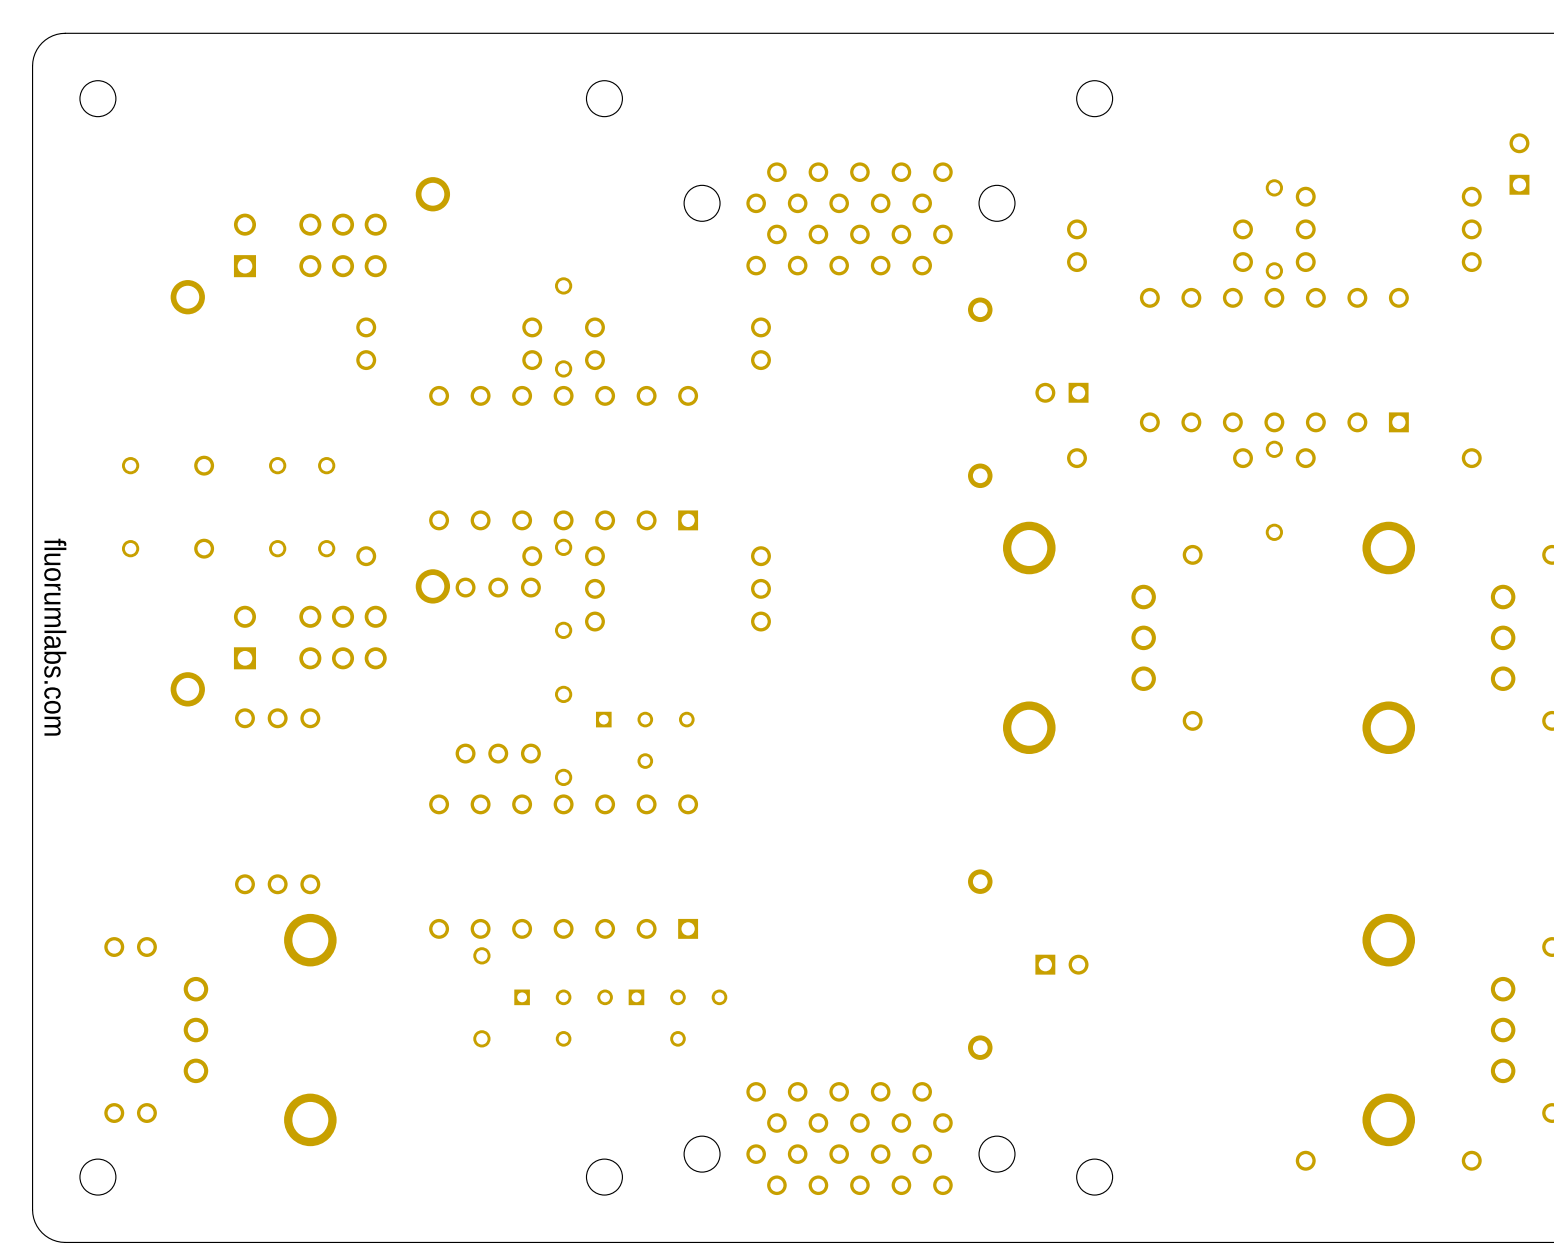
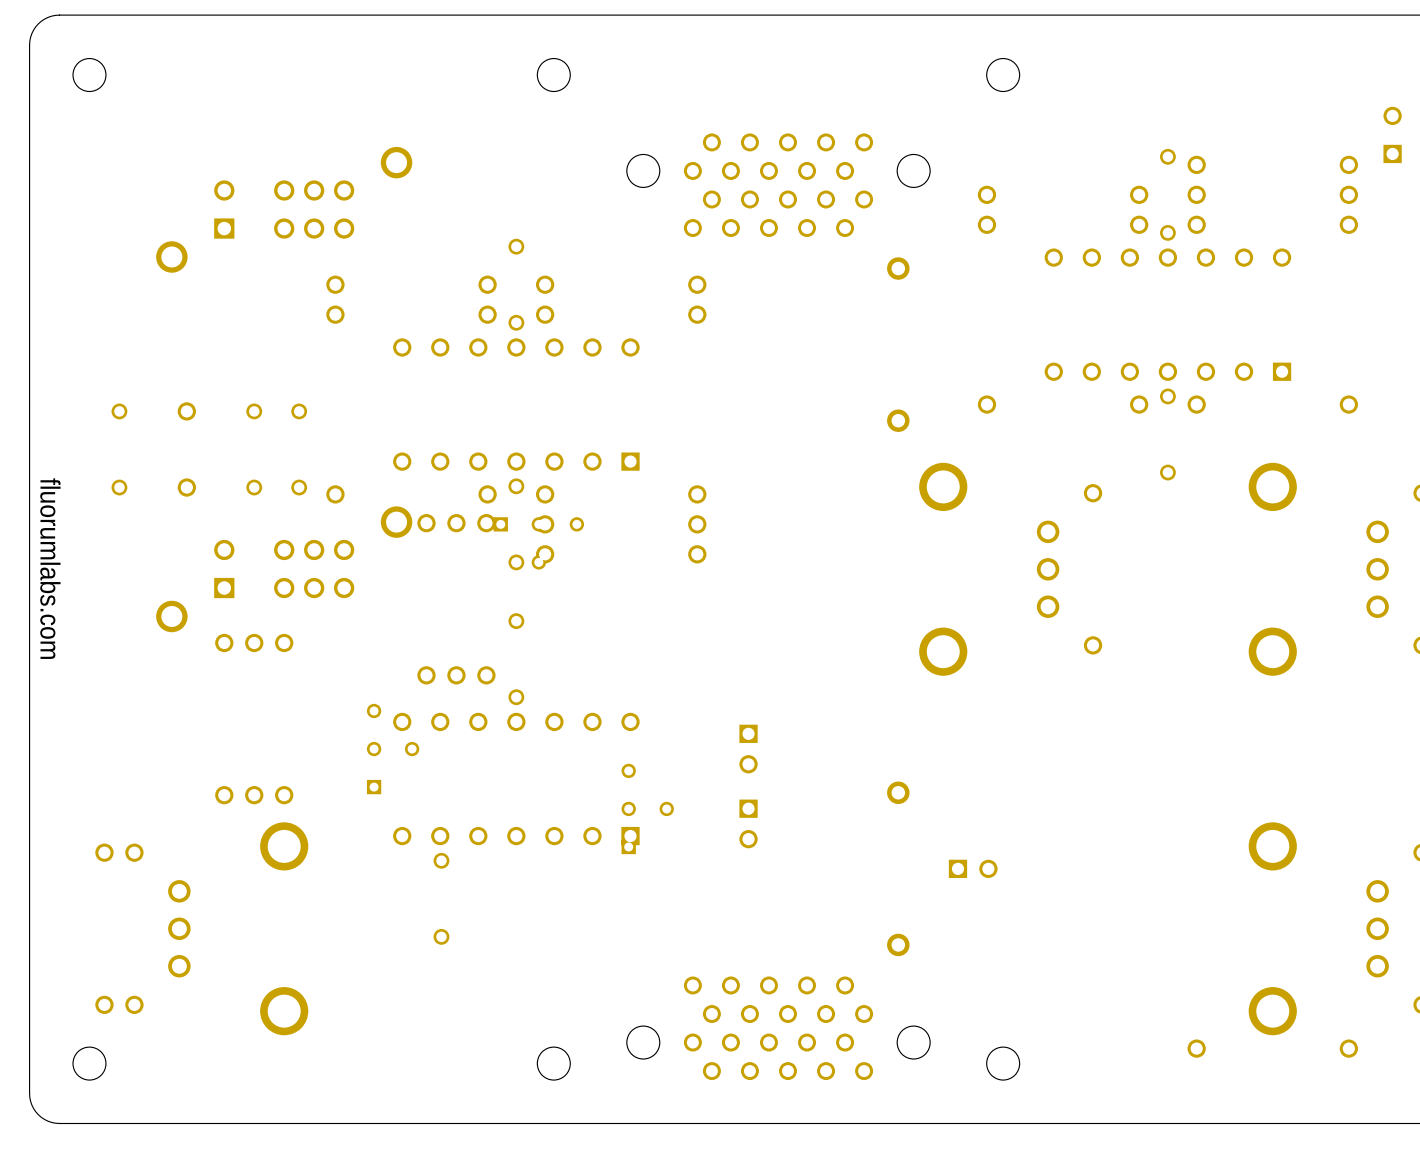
part: (1061, 392) -> none
part: none -> (538, 543)
part: (645, 740) -> none
part: none -> (393, 749)
part: none -> (748, 749)
part: none -> (647, 808)
part: none -> (748, 823)
part: (563, 1018) -> none
part: (677, 1018) -> none

